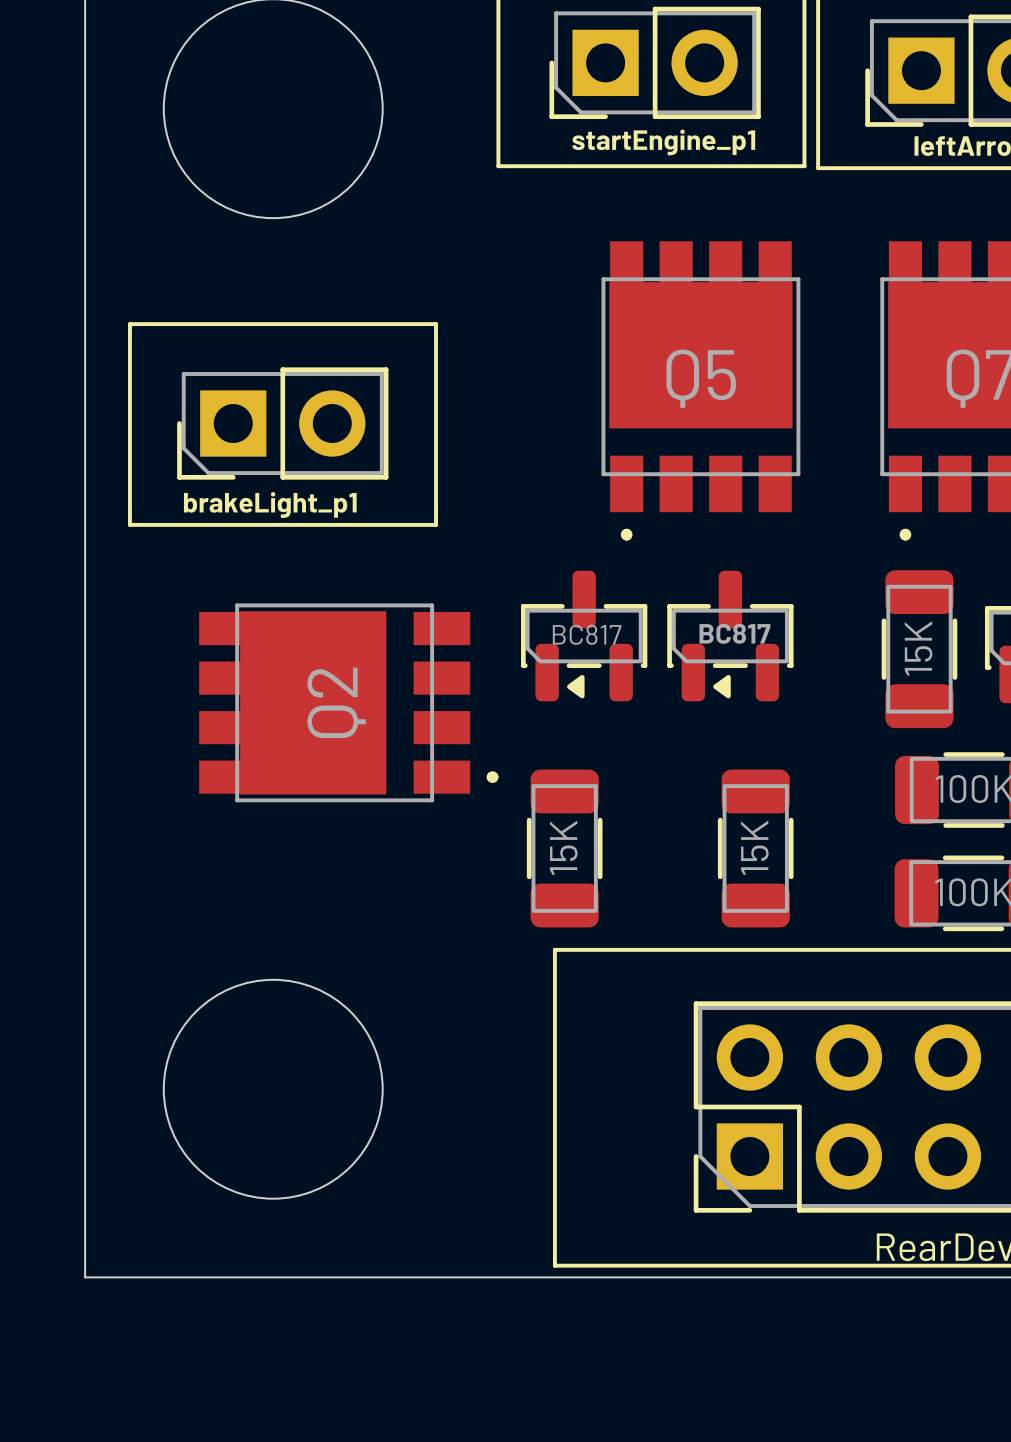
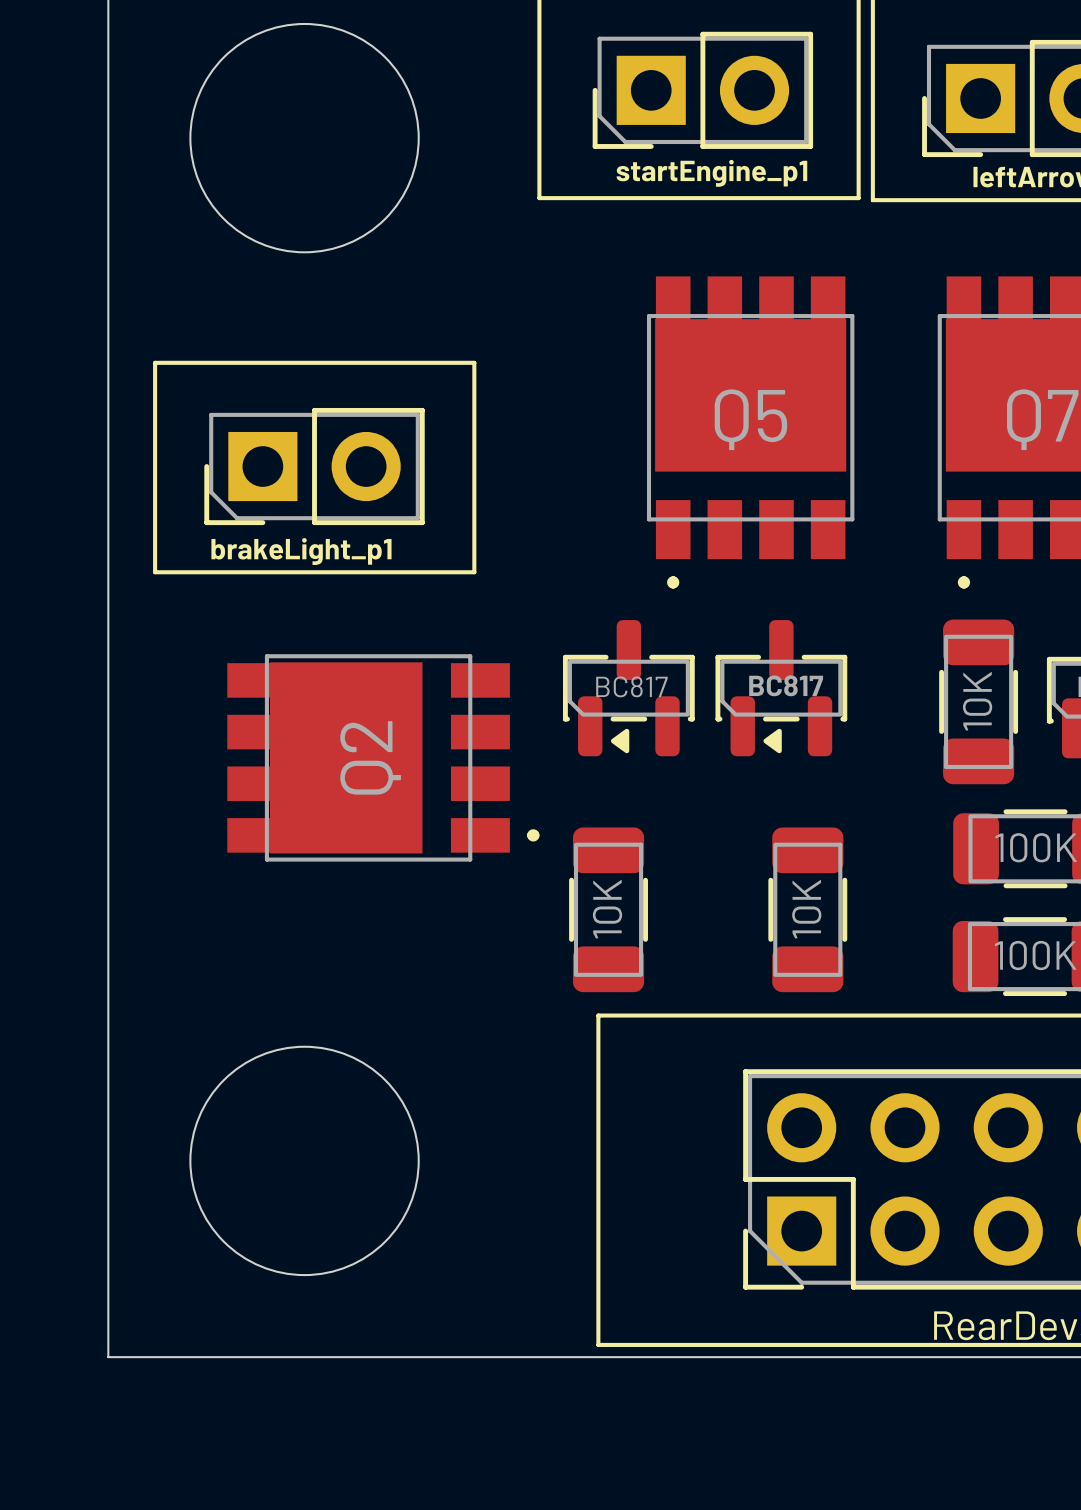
part value: 15K (918, 648) -> 10K (977, 701)
part value: 15K (563, 847) -> 10K (607, 909)
part value: 15K (754, 847) -> 10K (806, 909)

